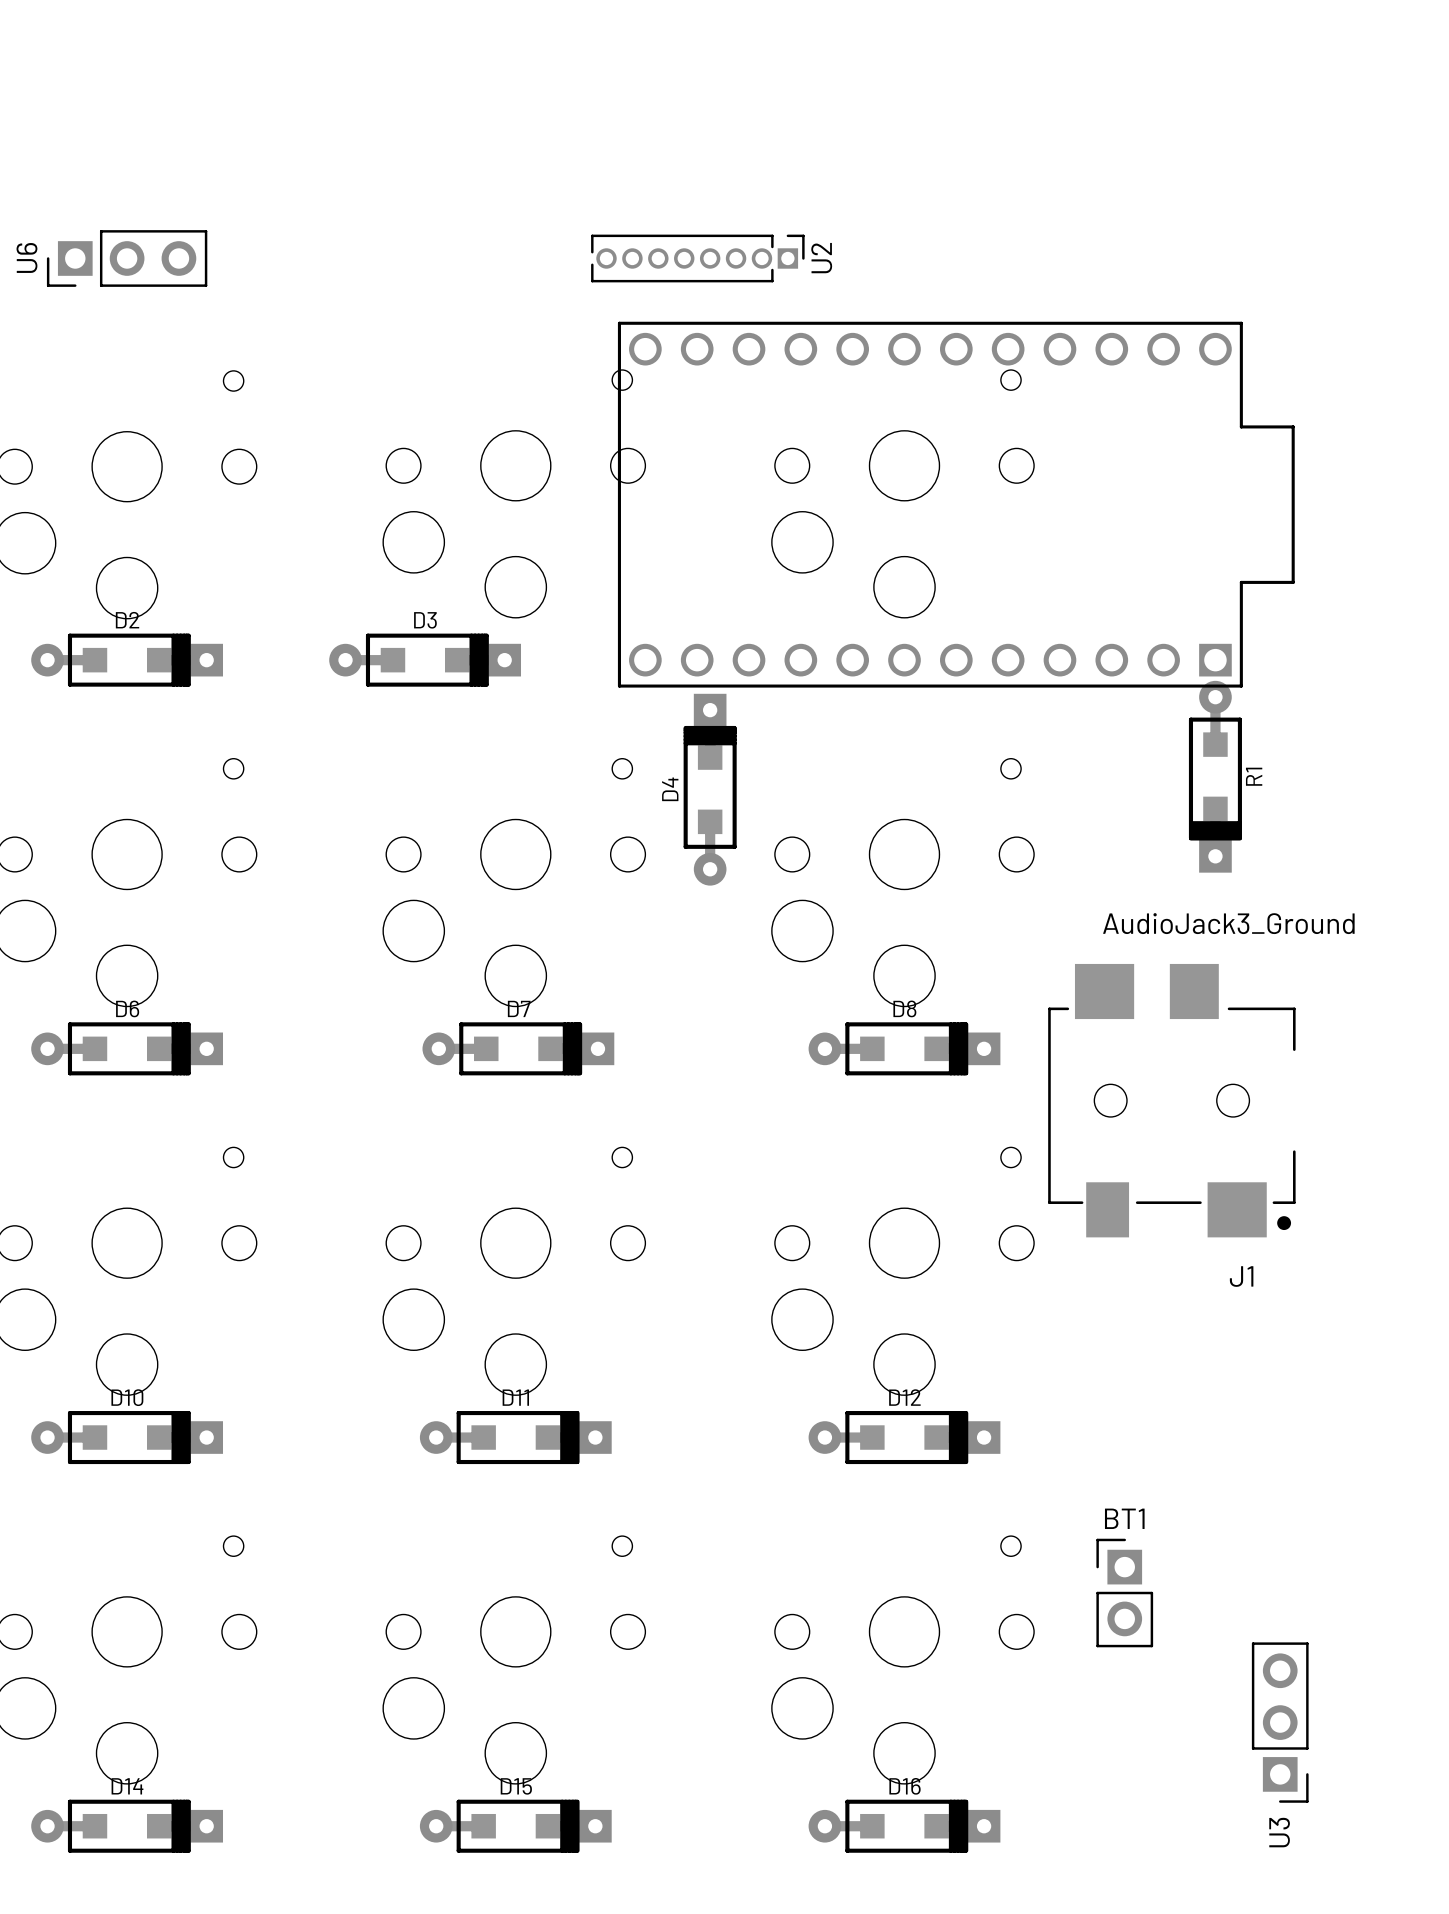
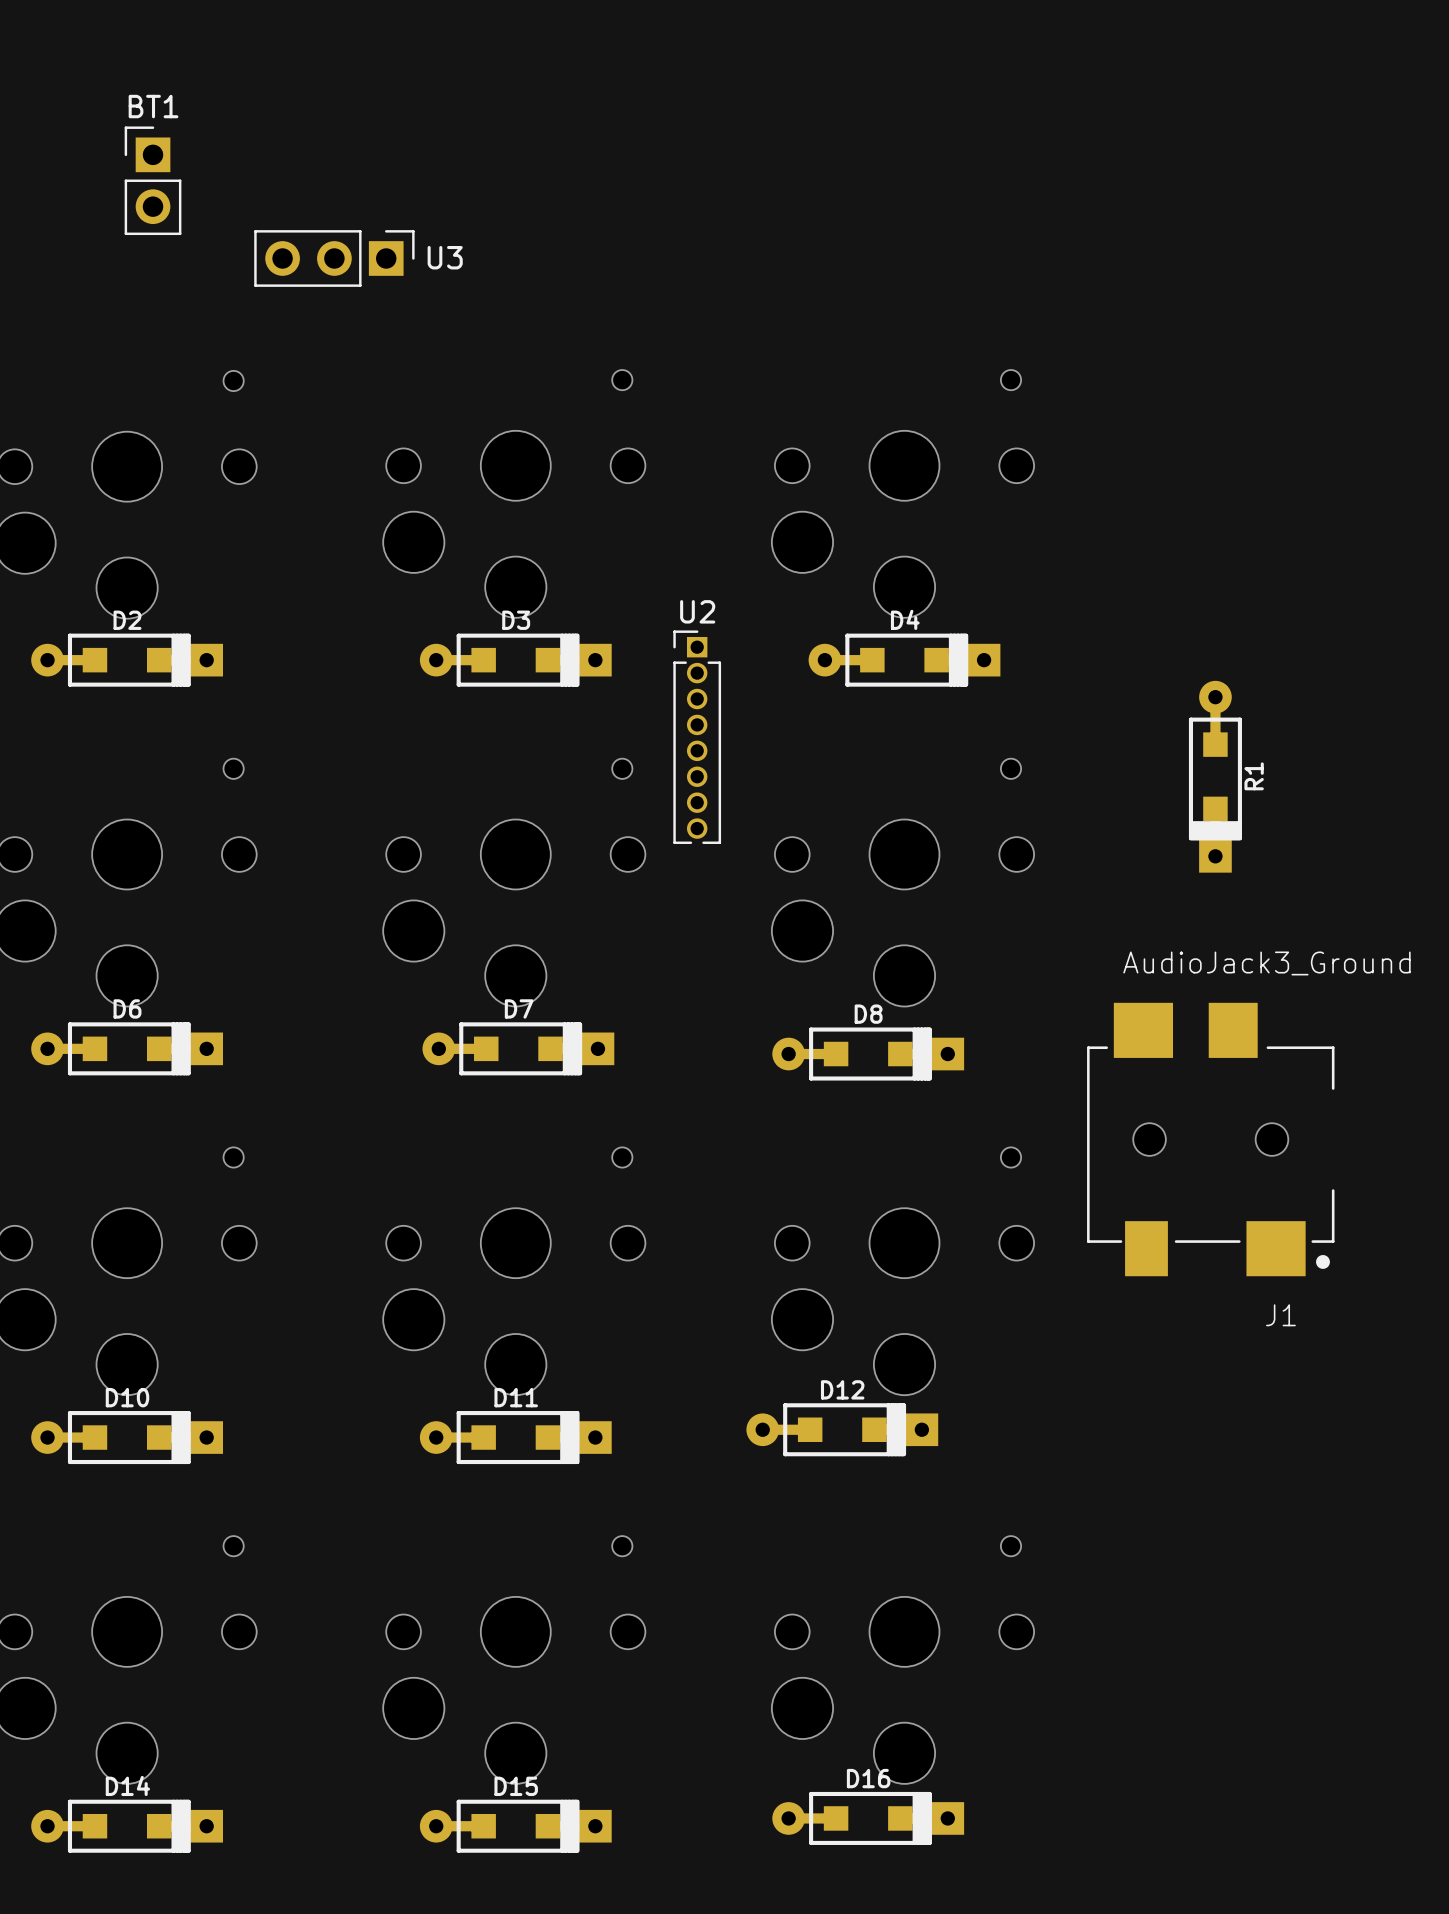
U6: (127, 258) -> none
U2 rotation: 0° (697, 258) -> 90° counterclockwise (697, 737)
U2 position: (697, 258) -> (697, 737)
part: (956, 504) -> none
D3 position: (425, 660) -> (515, 660)
D4 rotation: 0° (710, 789) -> 90° clockwise (904, 660)
D4 position: (710, 789) -> (904, 660)
D8 position: (904, 1048) -> (868, 1054)
J1 position: (1171, 1100) -> (1210, 1139)
D12 position: (904, 1437) -> (842, 1429)
BT1 position: (1124, 1593) -> (153, 180)
U3 rotation: 0° (1280, 1722) -> 90° counterclockwise (334, 258)
U3 position: (1280, 1722) -> (334, 258)
D16 position: (904, 1826) -> (868, 1818)

